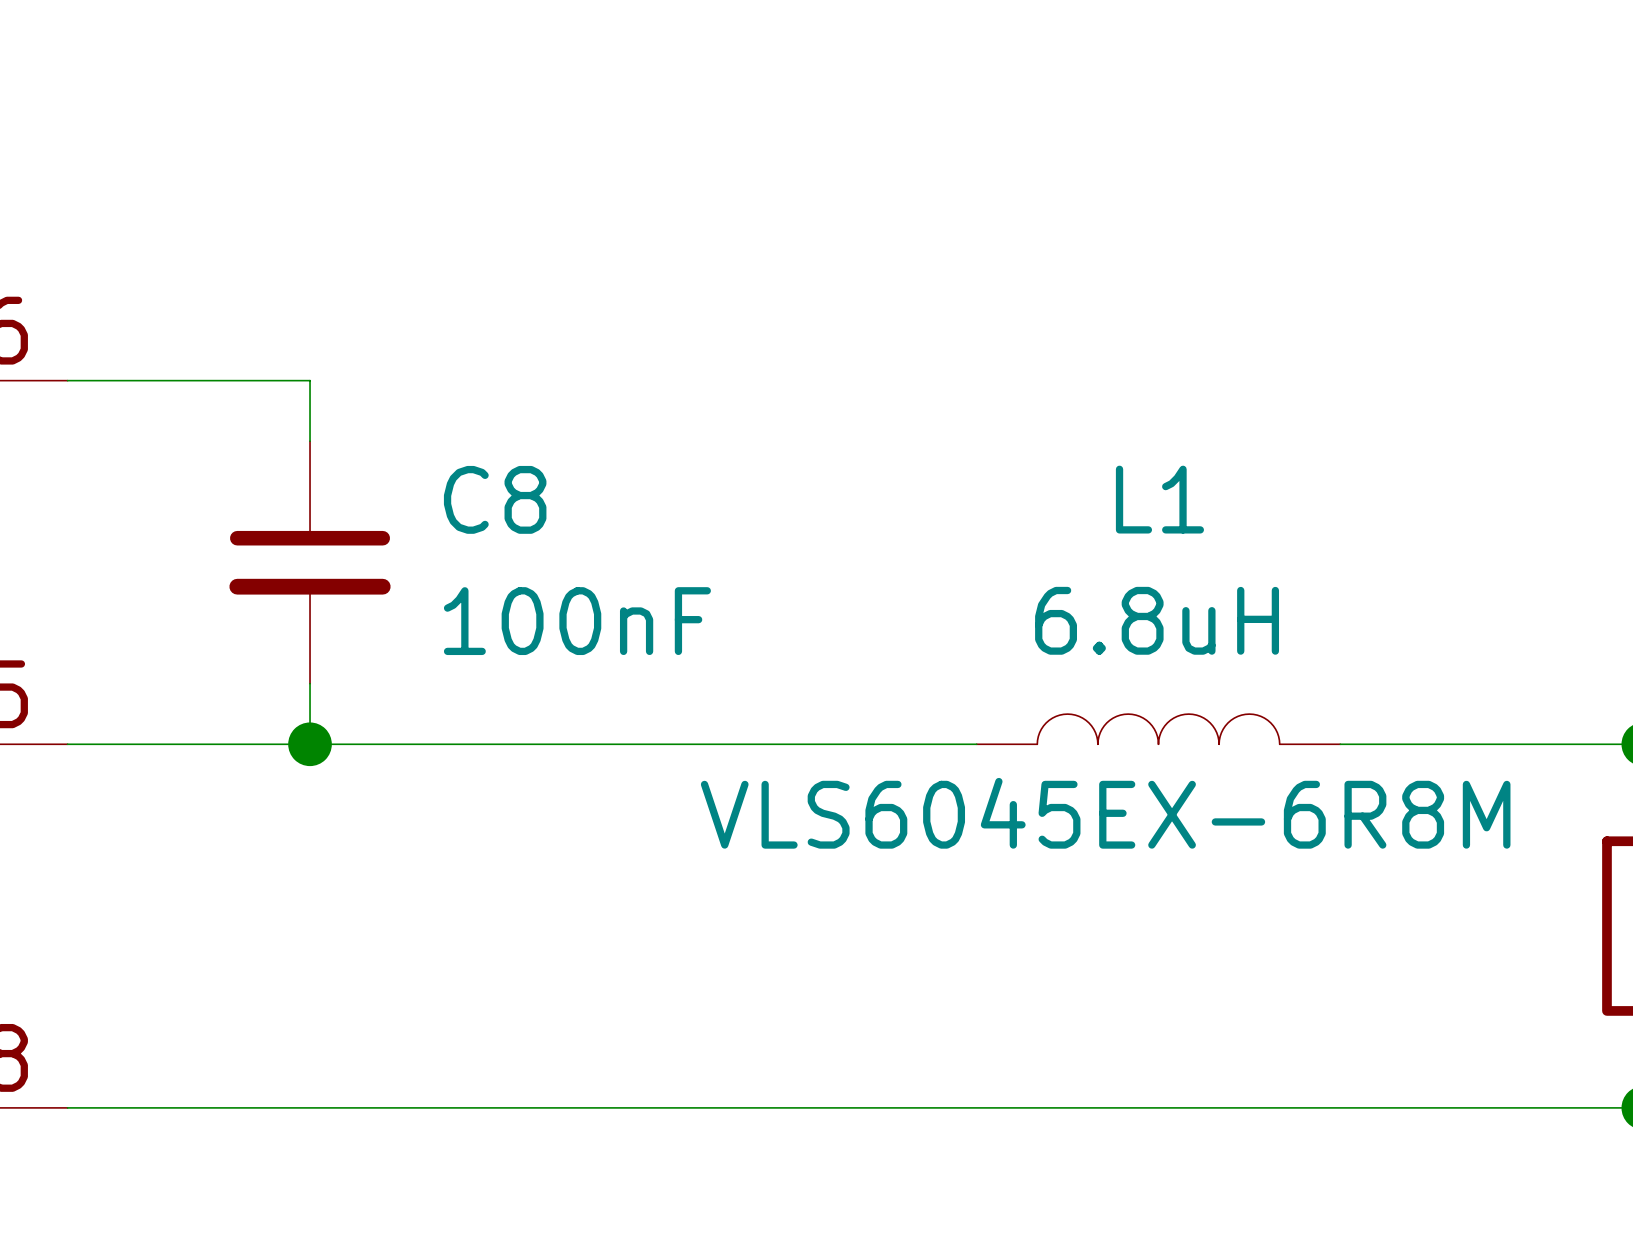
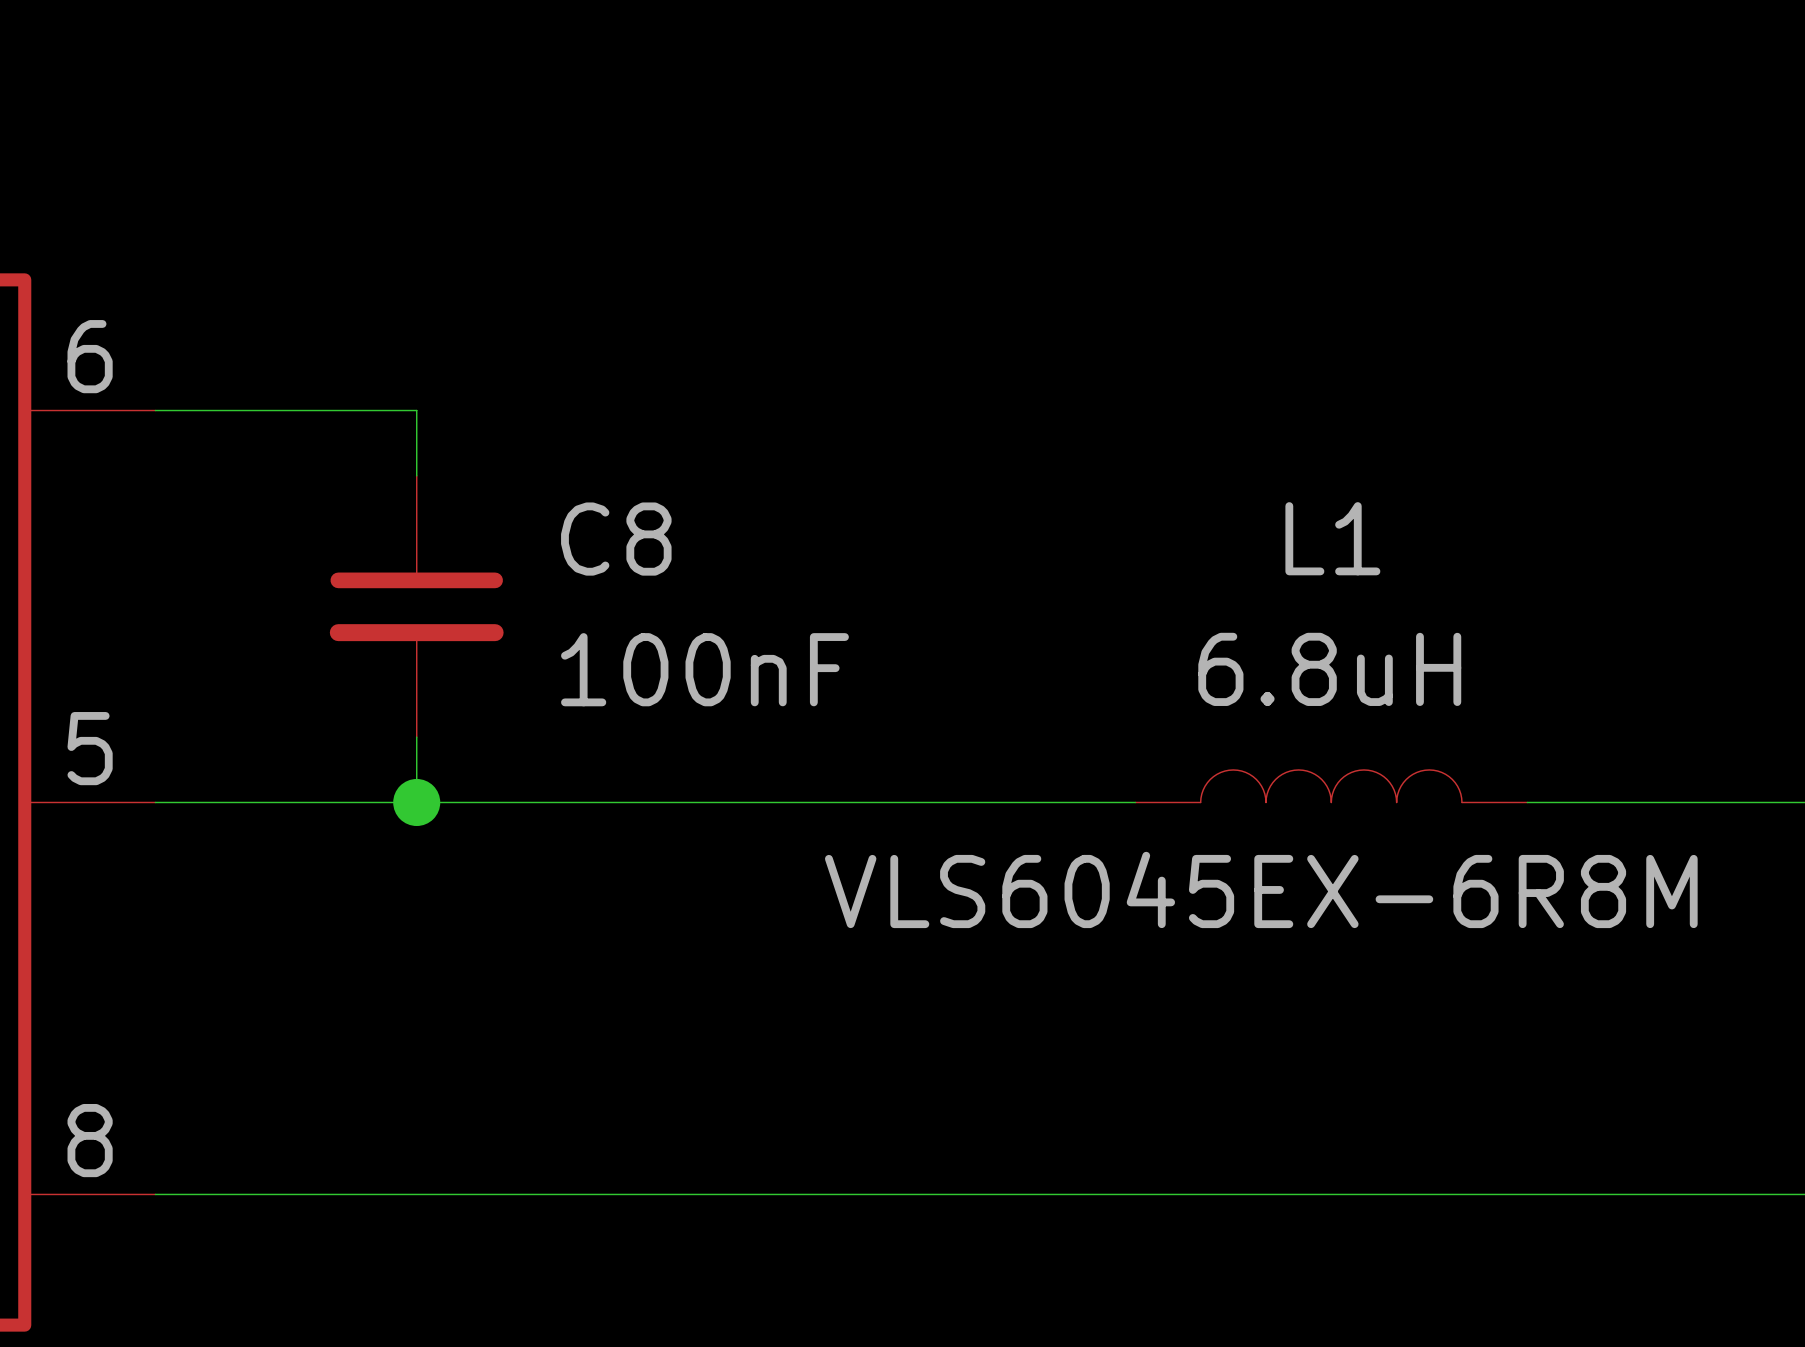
L1 text position: VLS6045EX-6R8M (1105, 813) -> VLS6045EX-6R8M (1261, 889)

